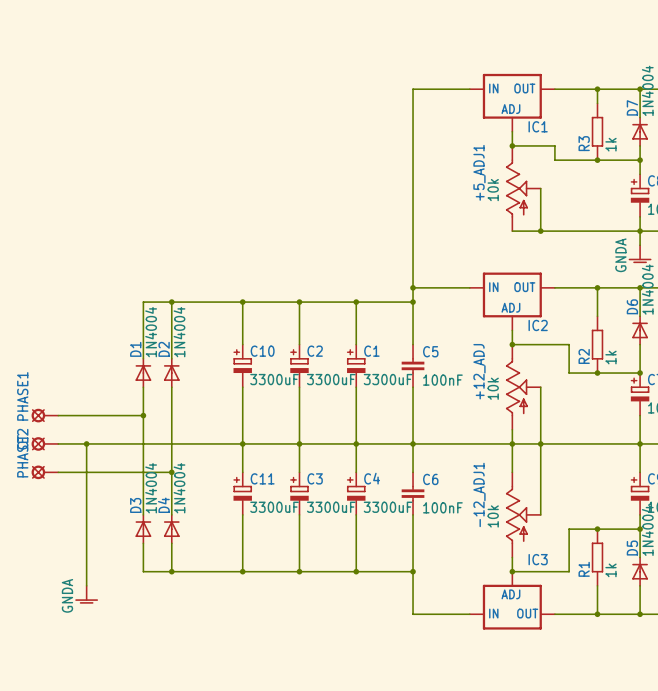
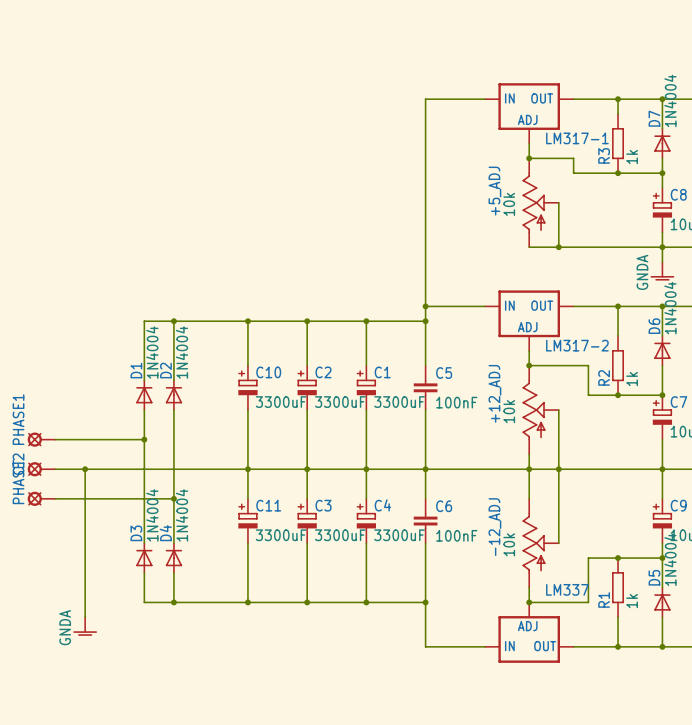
IC1 name: IC1 (538, 126) -> LM317-1 (577, 138)
+5_ADJ1 name: +5_ADJ1 (479, 172) -> +5_ADJ (494, 191)
IC2 name: IC2 (538, 325) -> LM317-2 (577, 345)
-12_ADJ1 name: -12_ADJ1 (479, 494) -> -12_ADJ (494, 527)
IC3 name: IC3 (538, 559) -> LM337 (567, 589)

